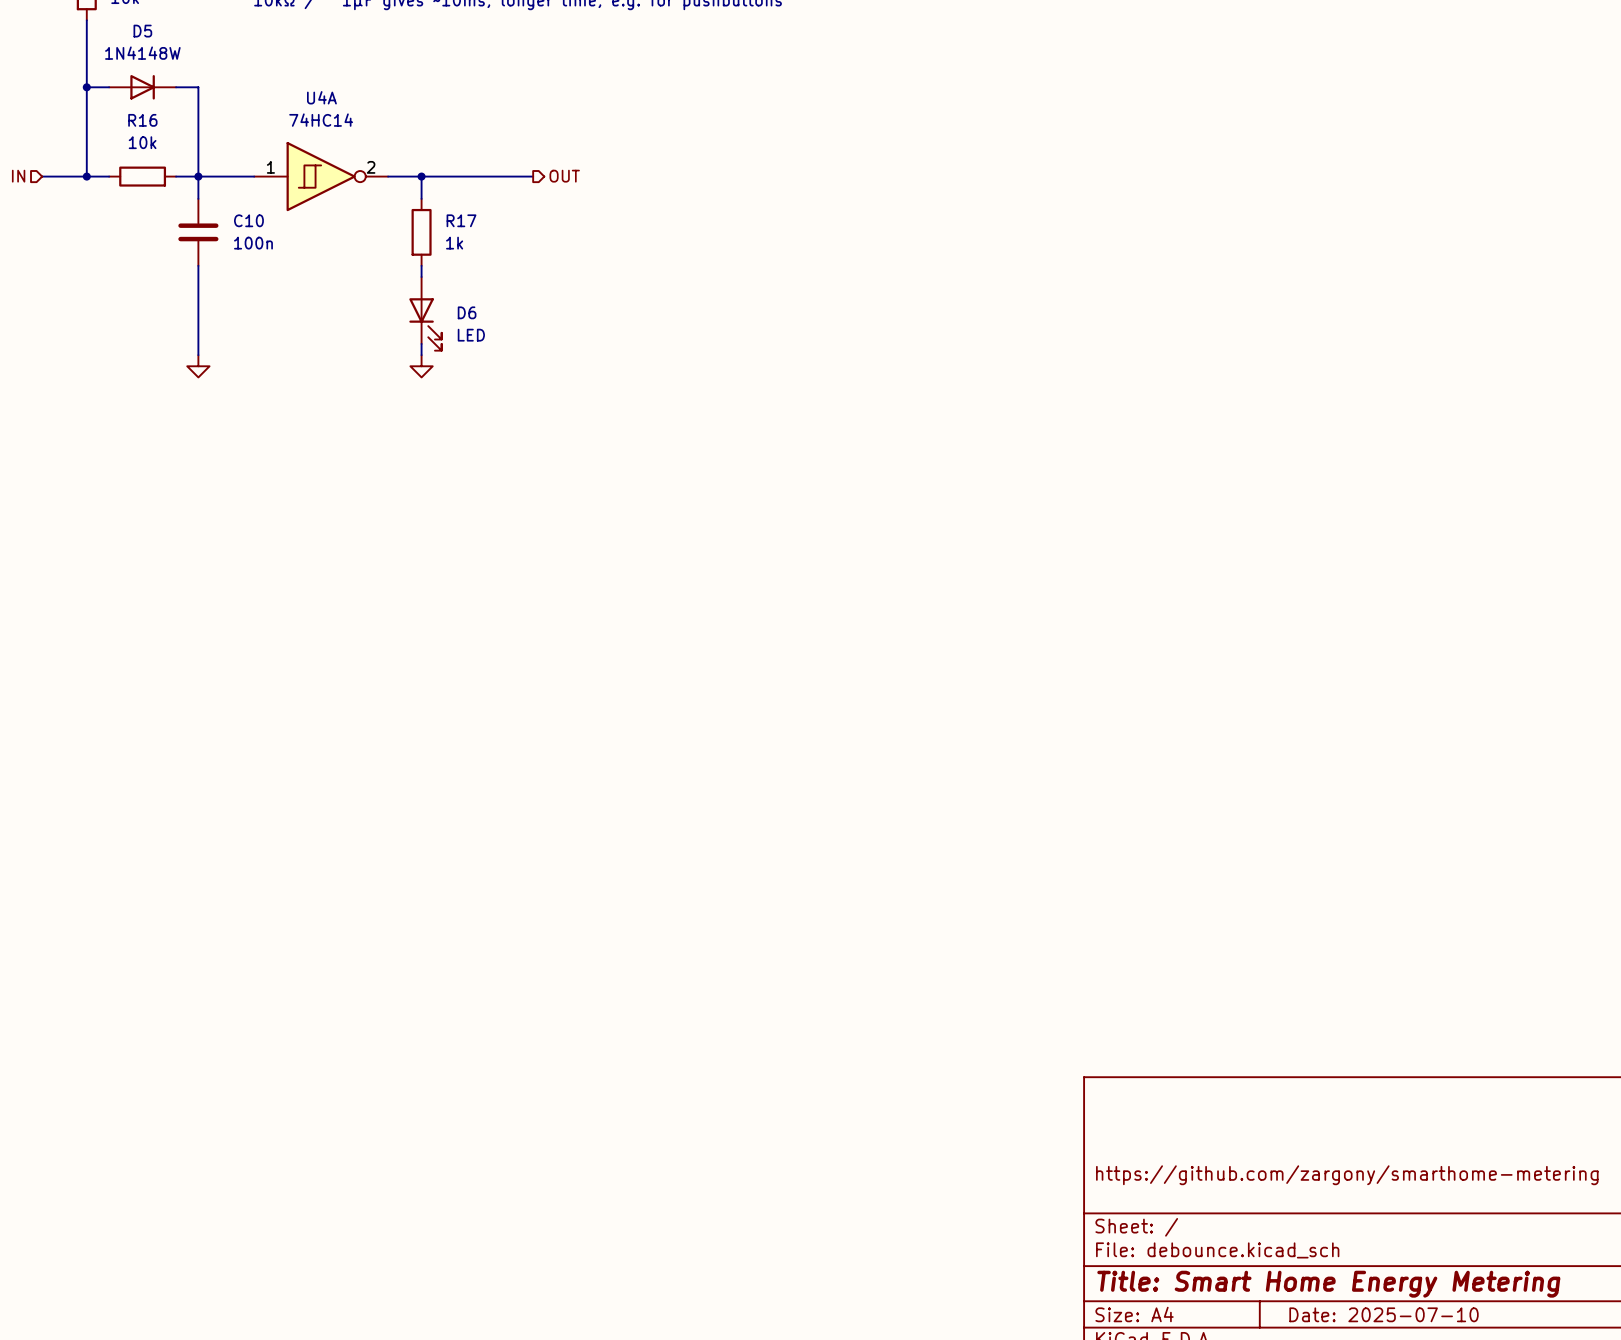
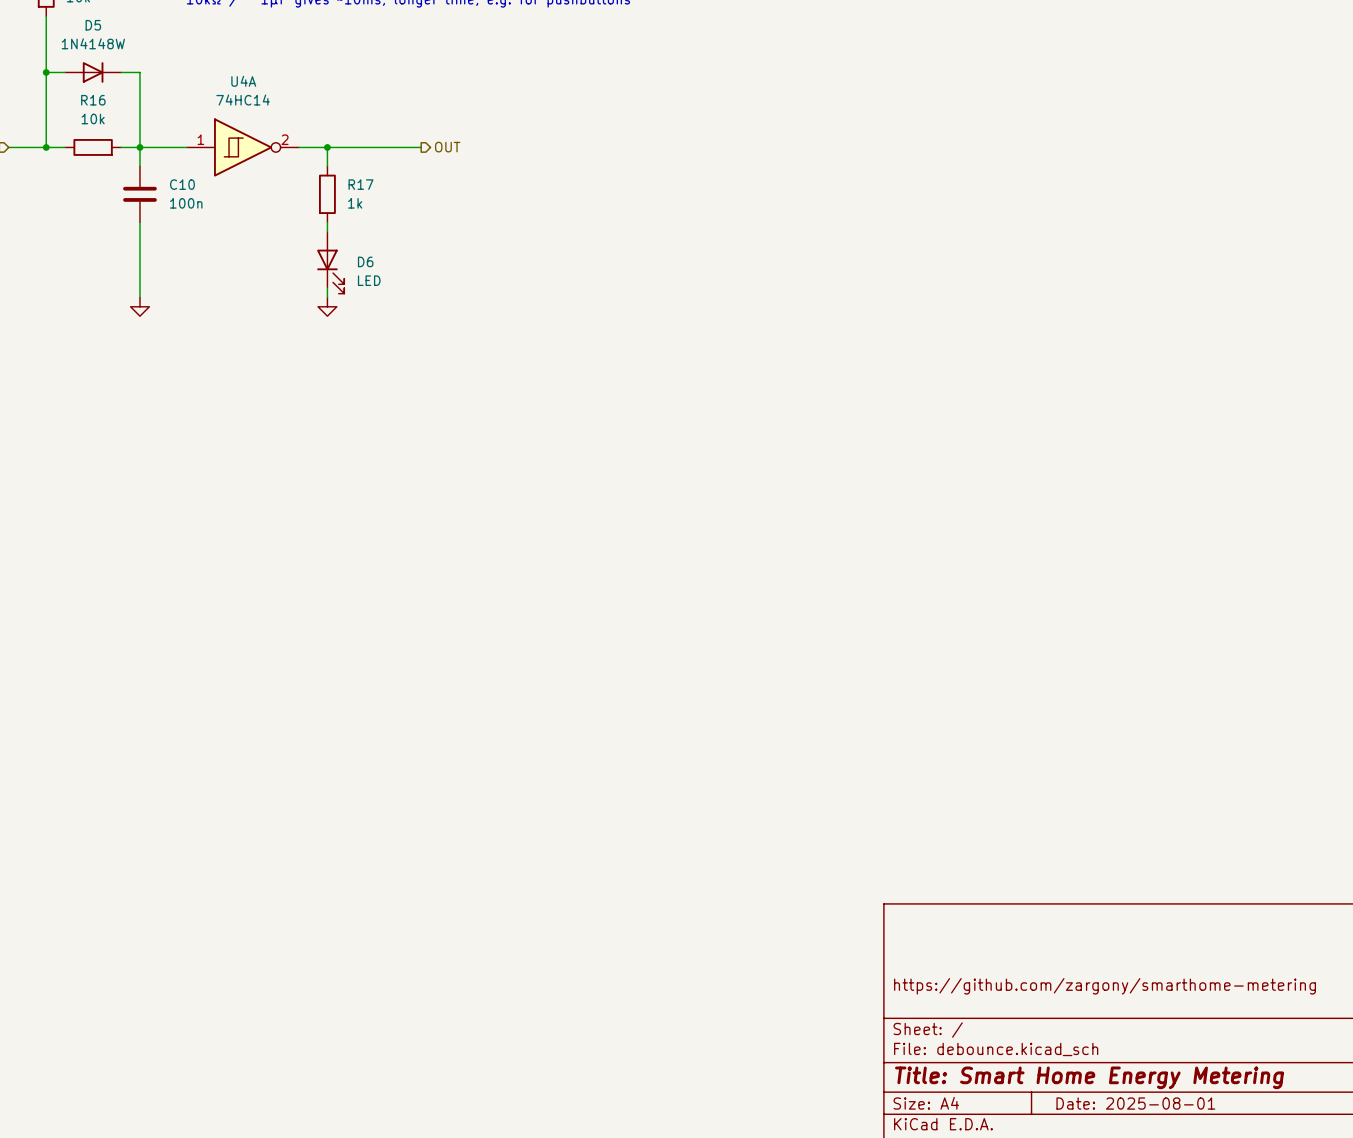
title block: Date: 2025-07-10 (1384, 1314) -> Date: 2025-08-01 (1135, 1103)

